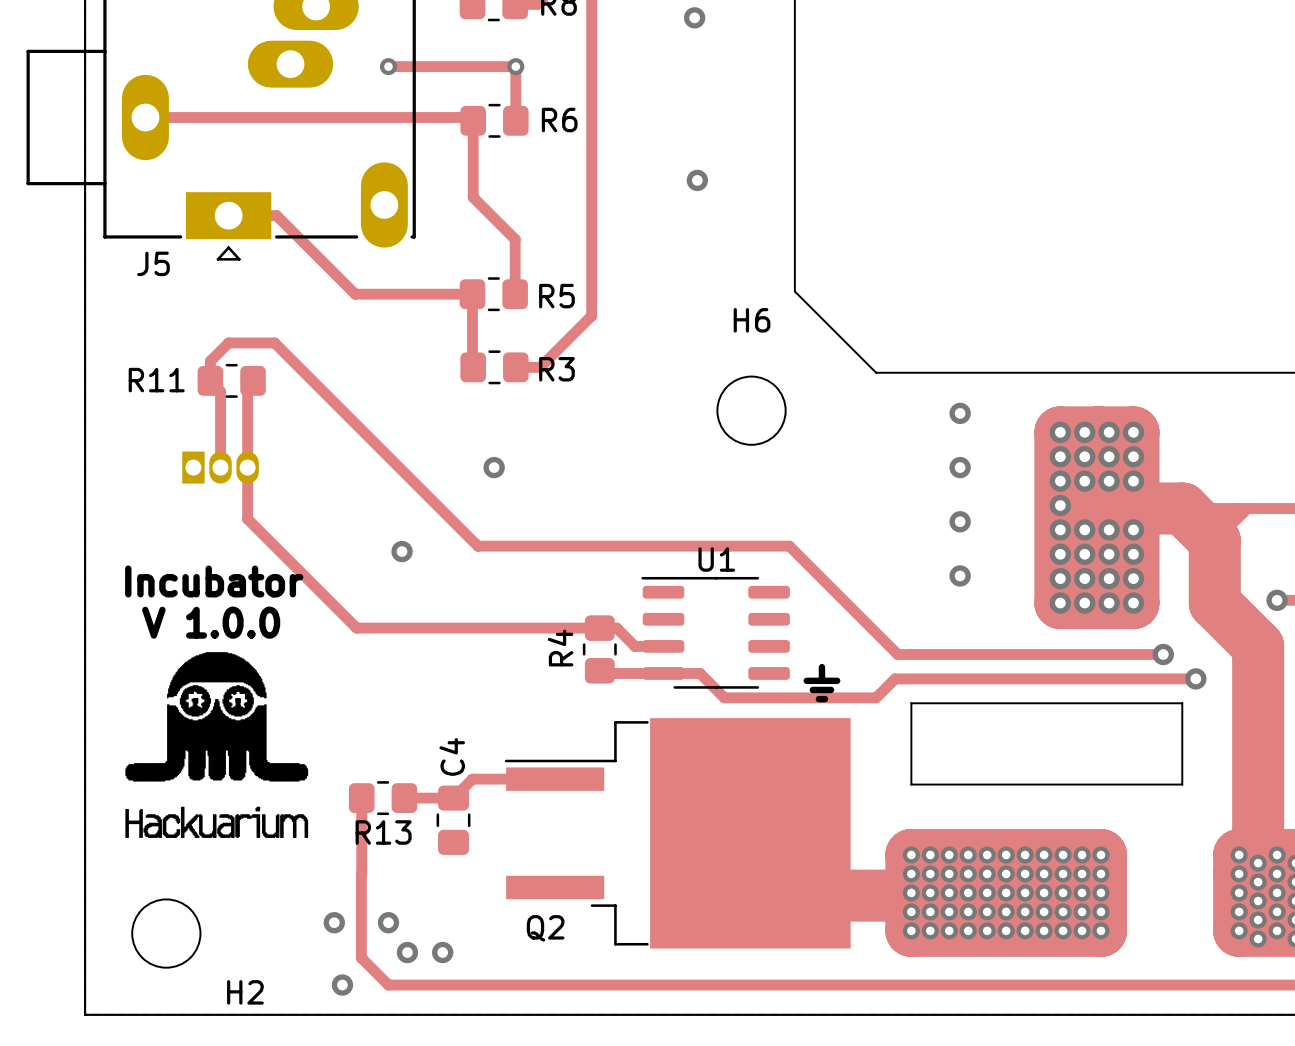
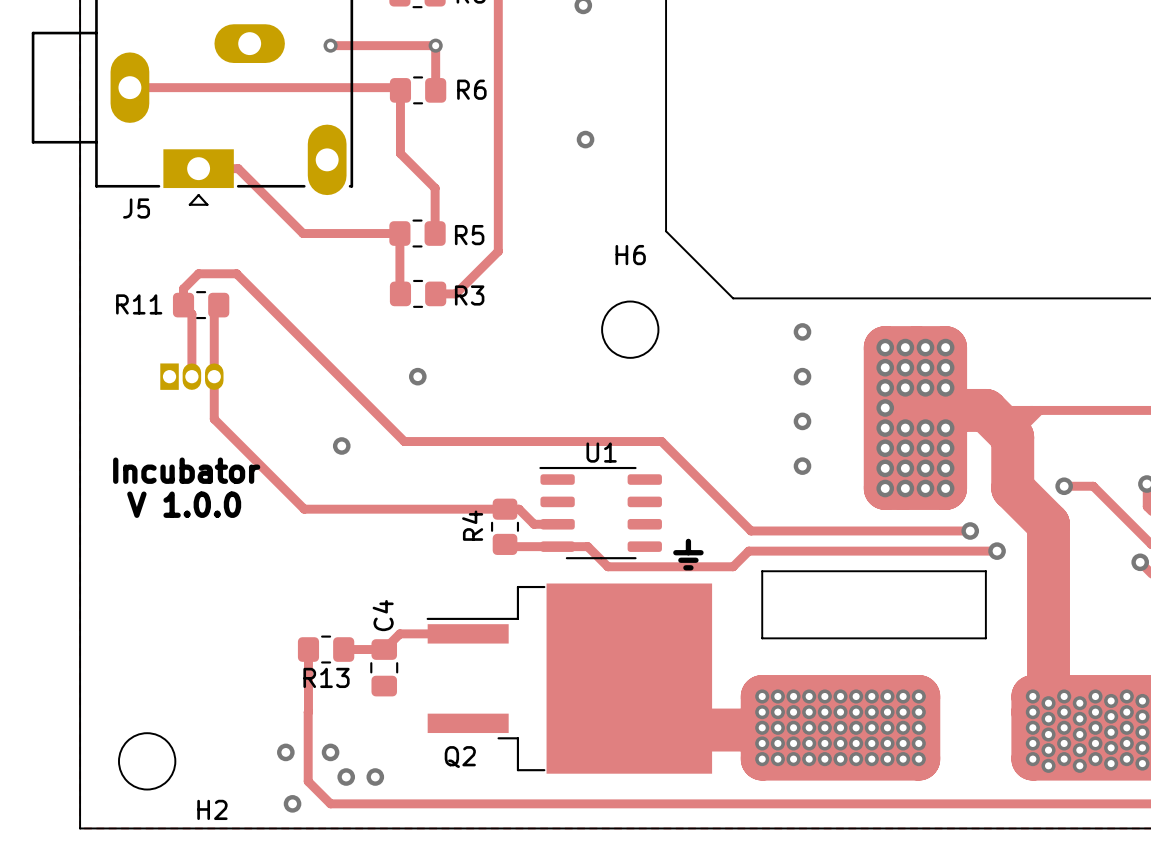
drawing: [125, 652, 309, 838] -> none

